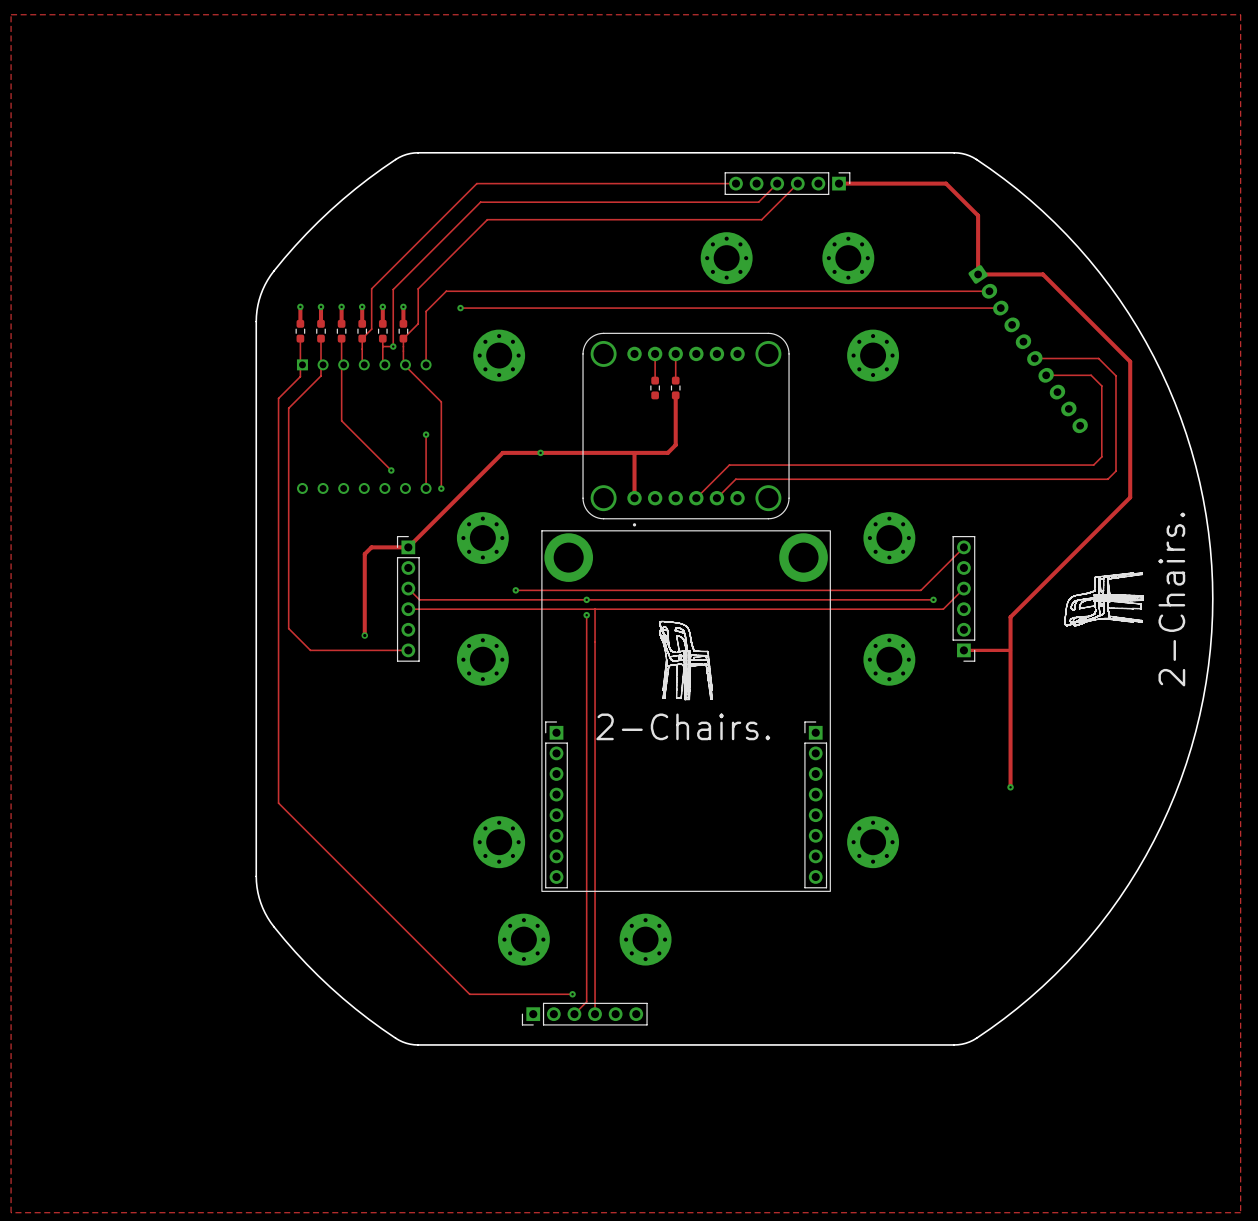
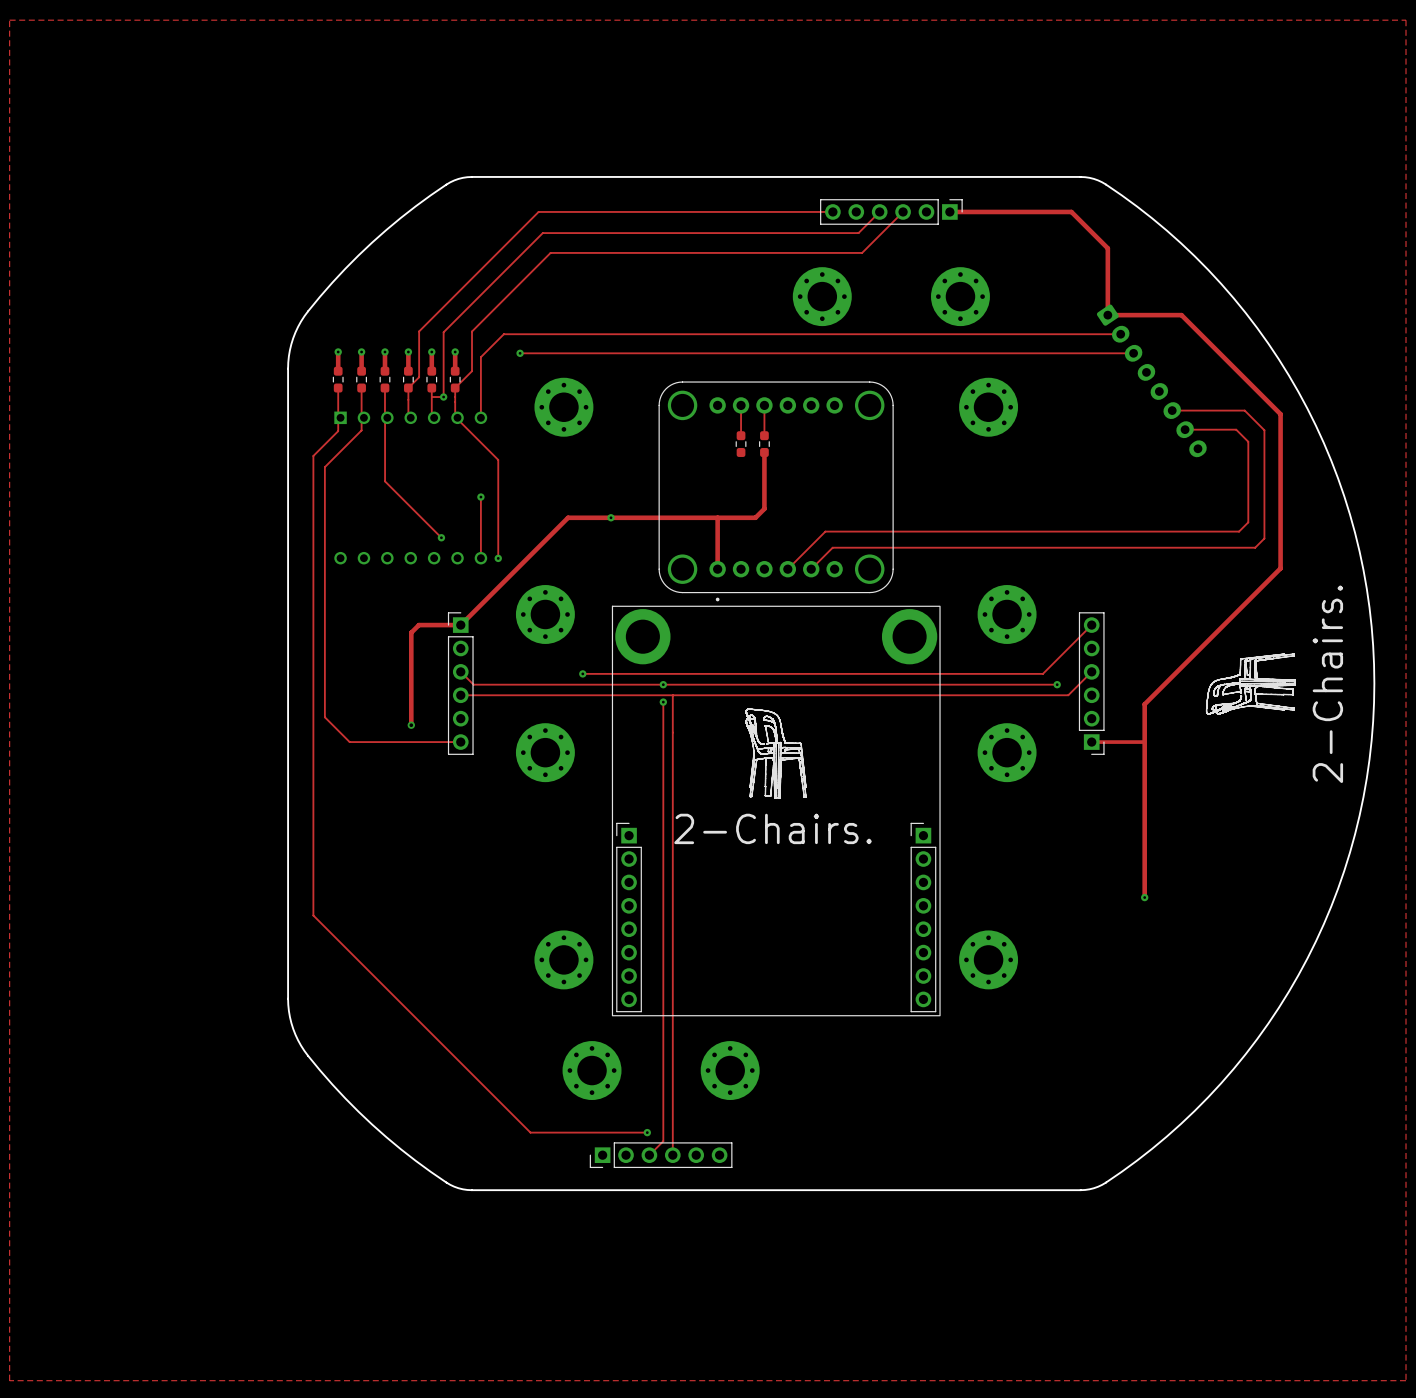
part: (1028, 349) -> none

